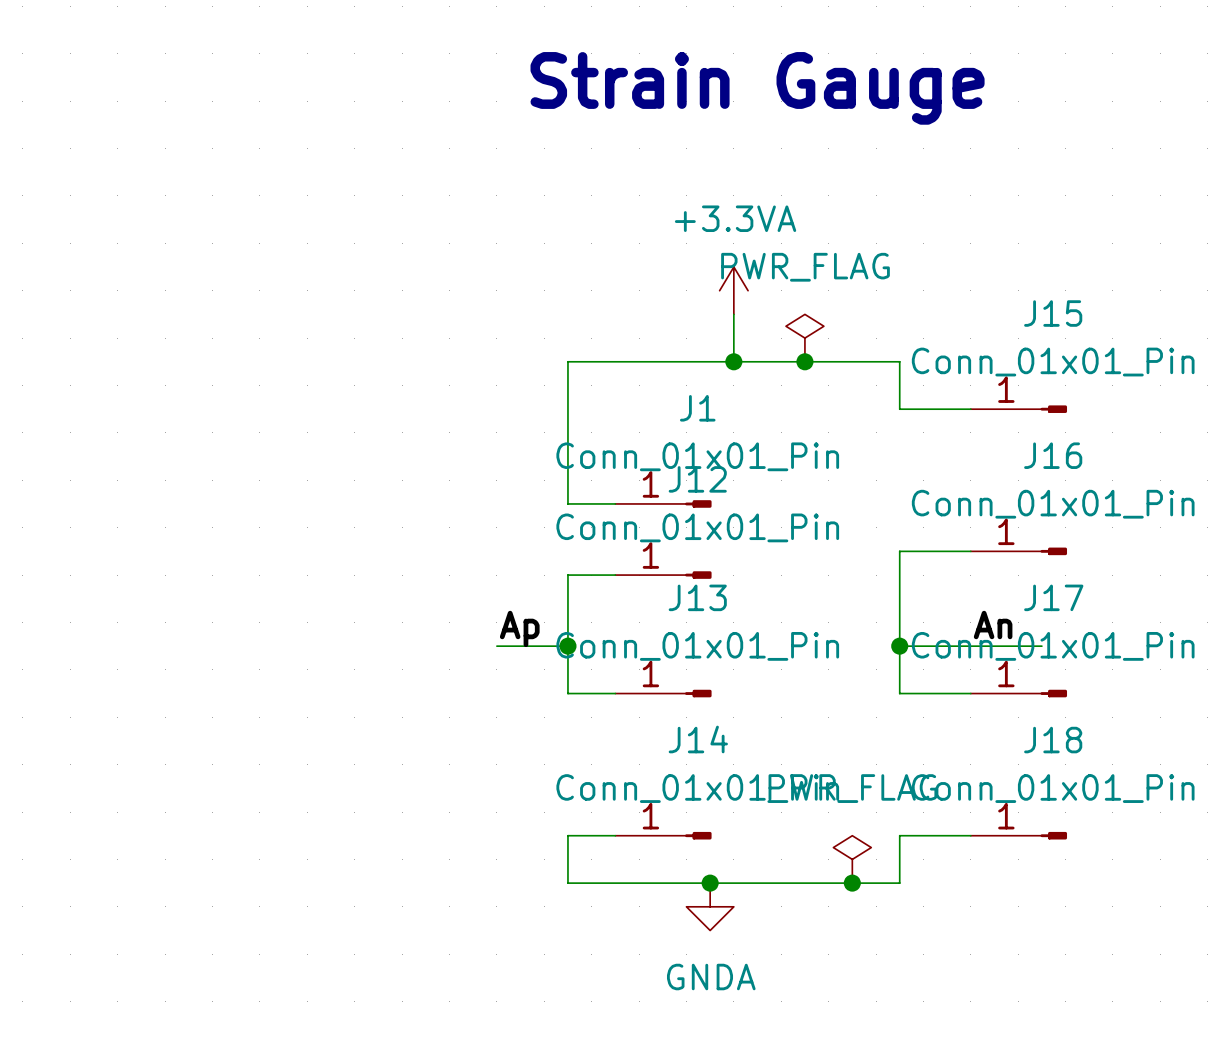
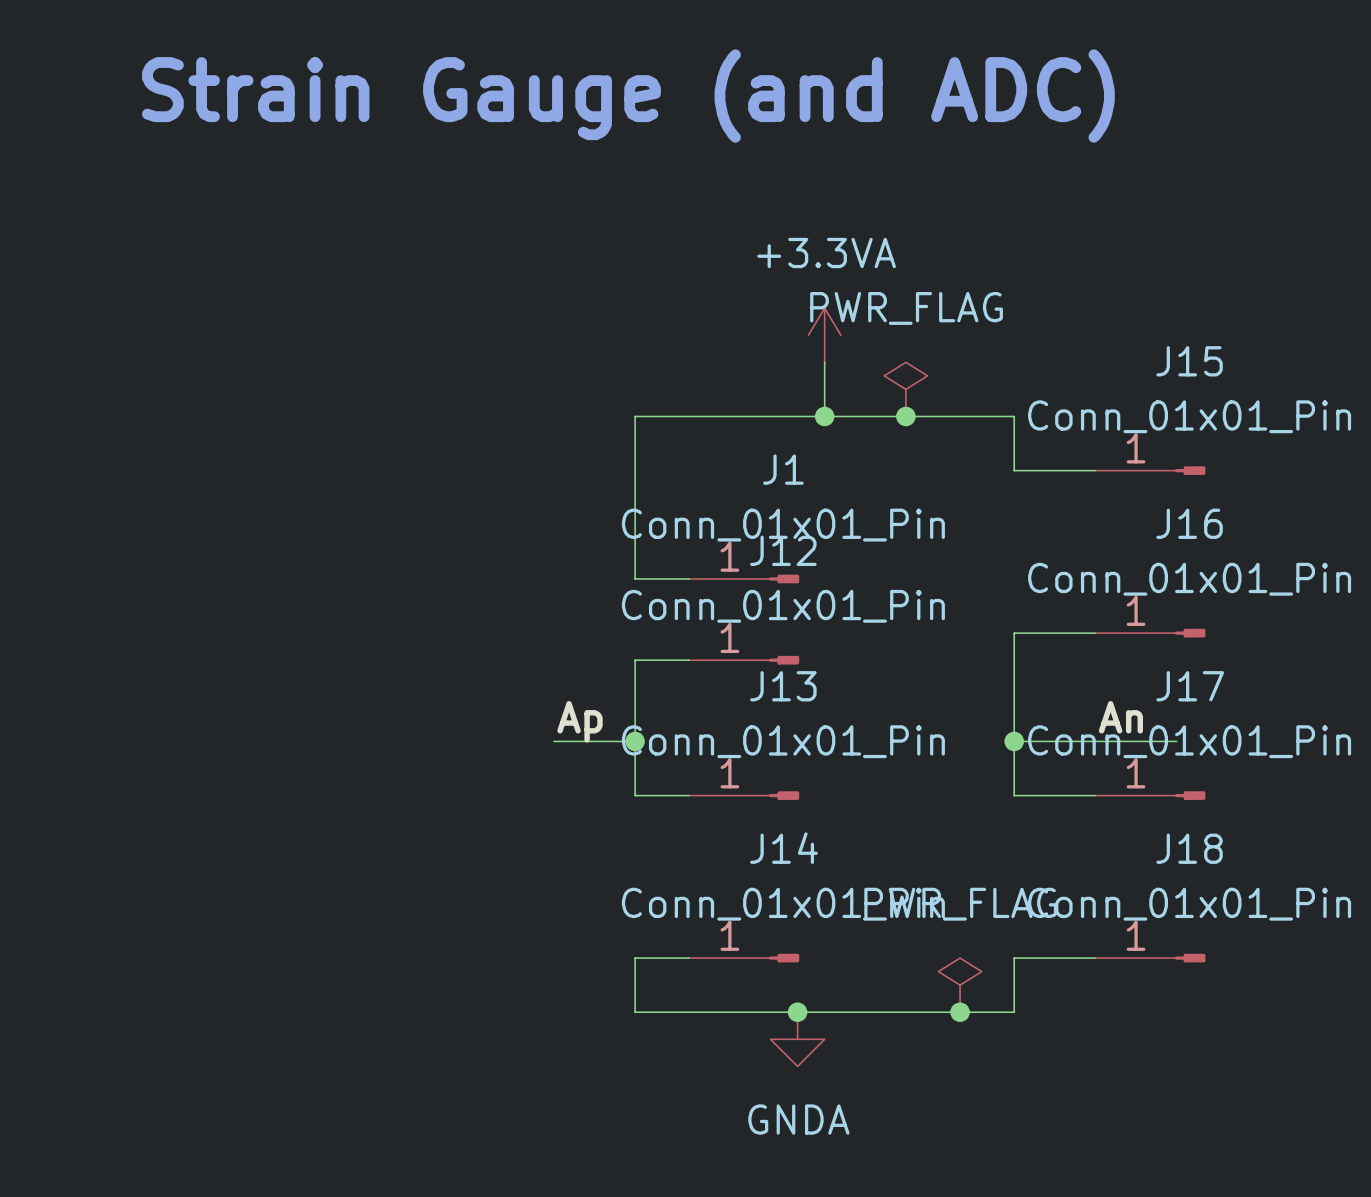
text: Strain Gauge (757, 88) -> Strain Gauge (and ADC) (628, 96)

